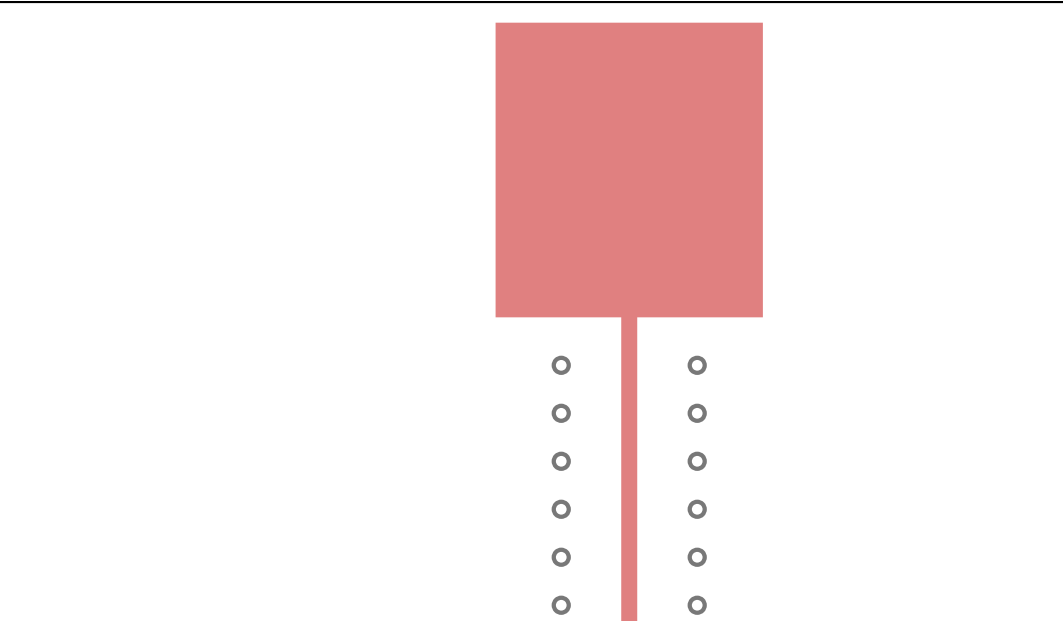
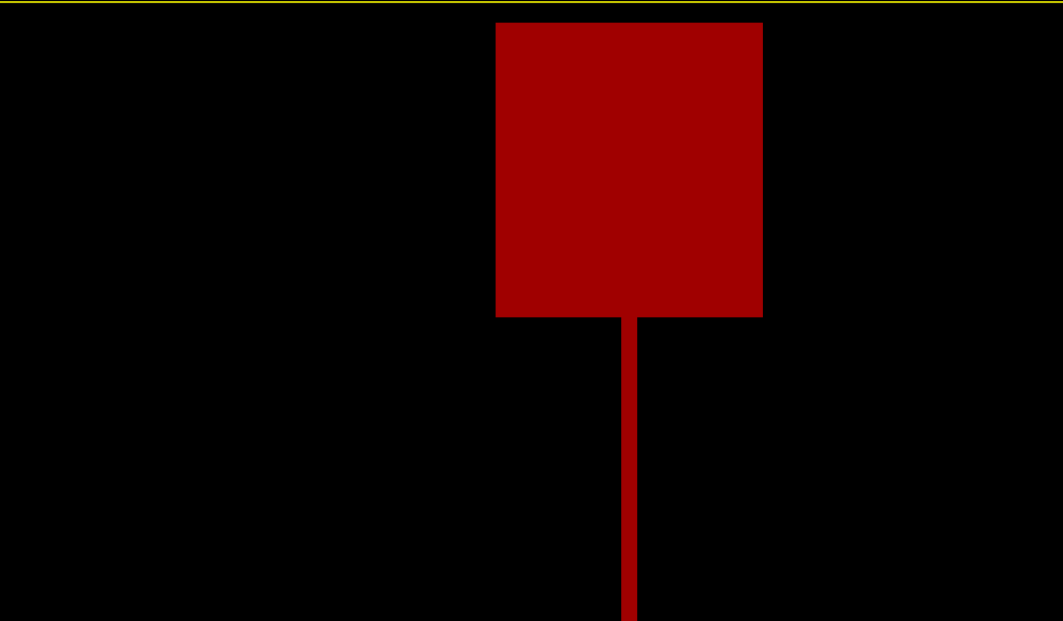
via: (561, 365) -> none
via: (697, 365) -> none
via: (561, 413) -> none
via: (697, 413) -> none
via: (561, 461) -> none
via: (697, 461) -> none
via: (561, 509) -> none
via: (697, 509) -> none
via: (561, 557) -> none
via: (697, 557) -> none
via: (561, 605) -> none
via: (697, 605) -> none

